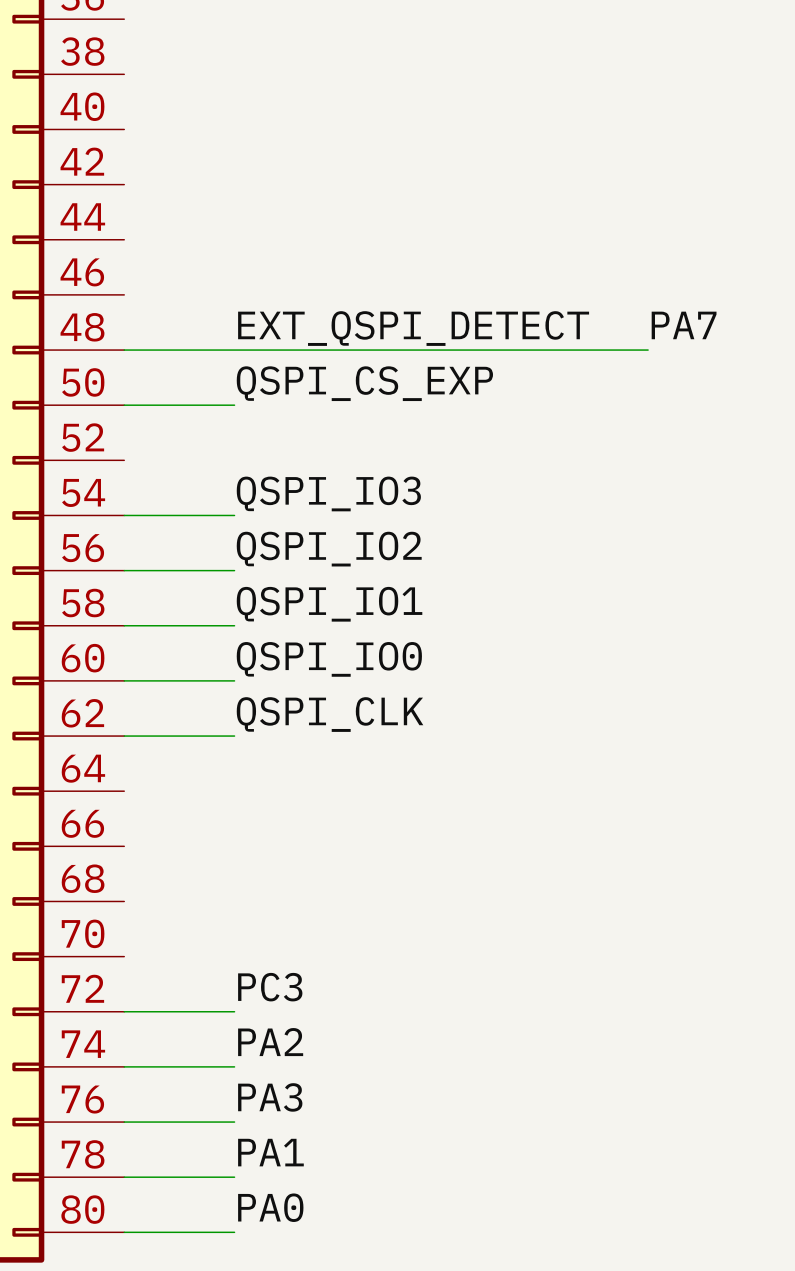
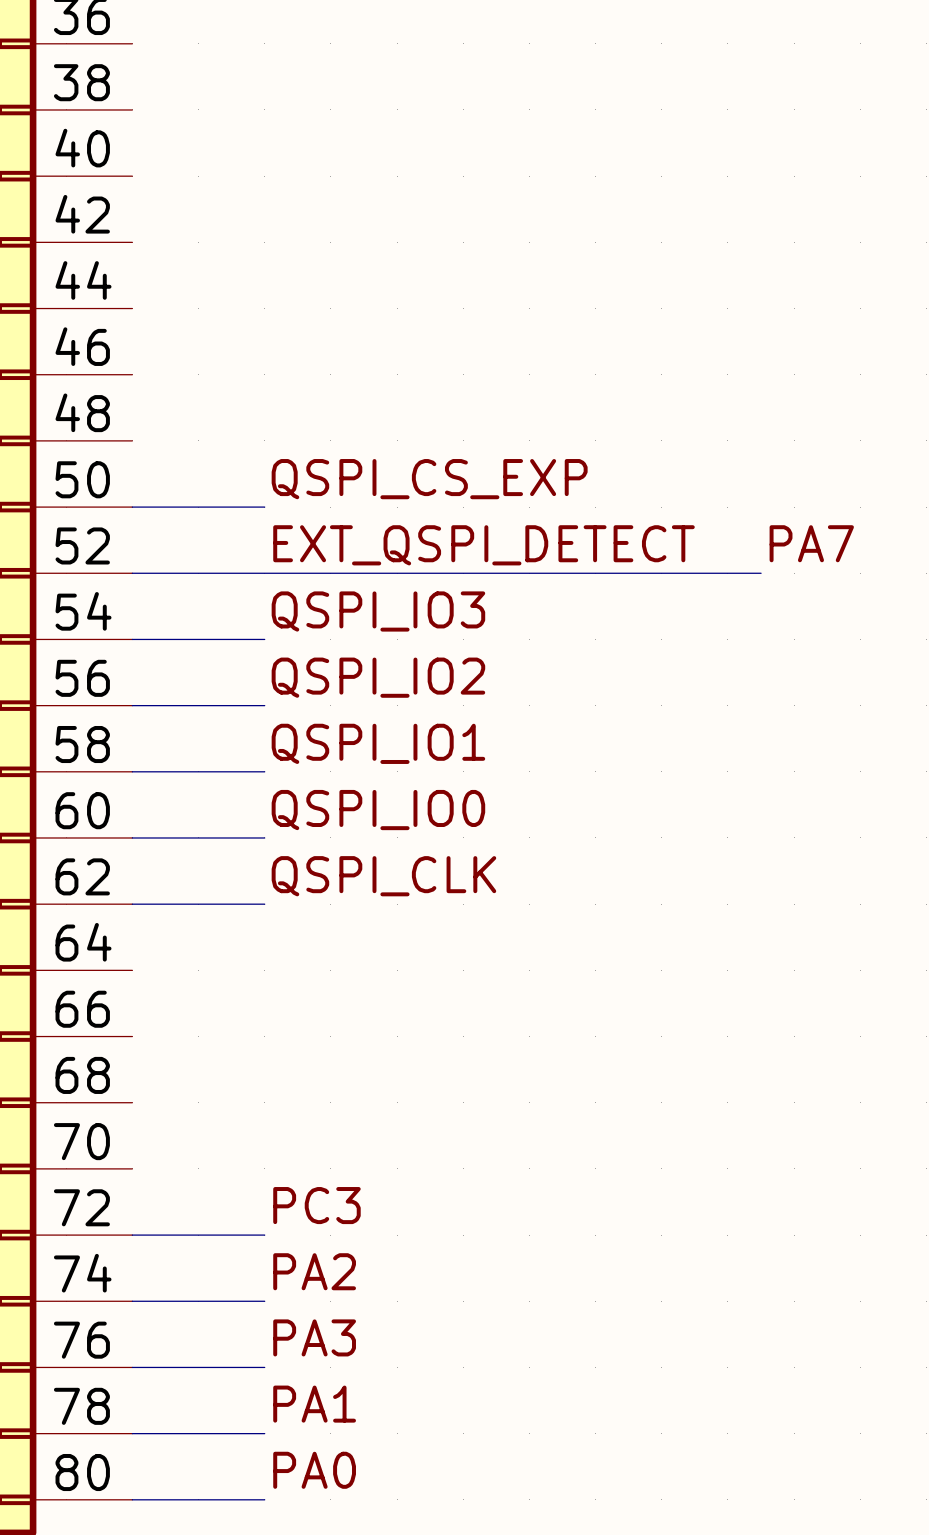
label position: PA7 (684, 325) -> PA7 (811, 543)
label position: EXT_QSPI_DETECT (413, 328) -> EXT_QSPI_DETECT (484, 545)
wire: (124, 350) (648, 350) -> (132, 573) (761, 573)

